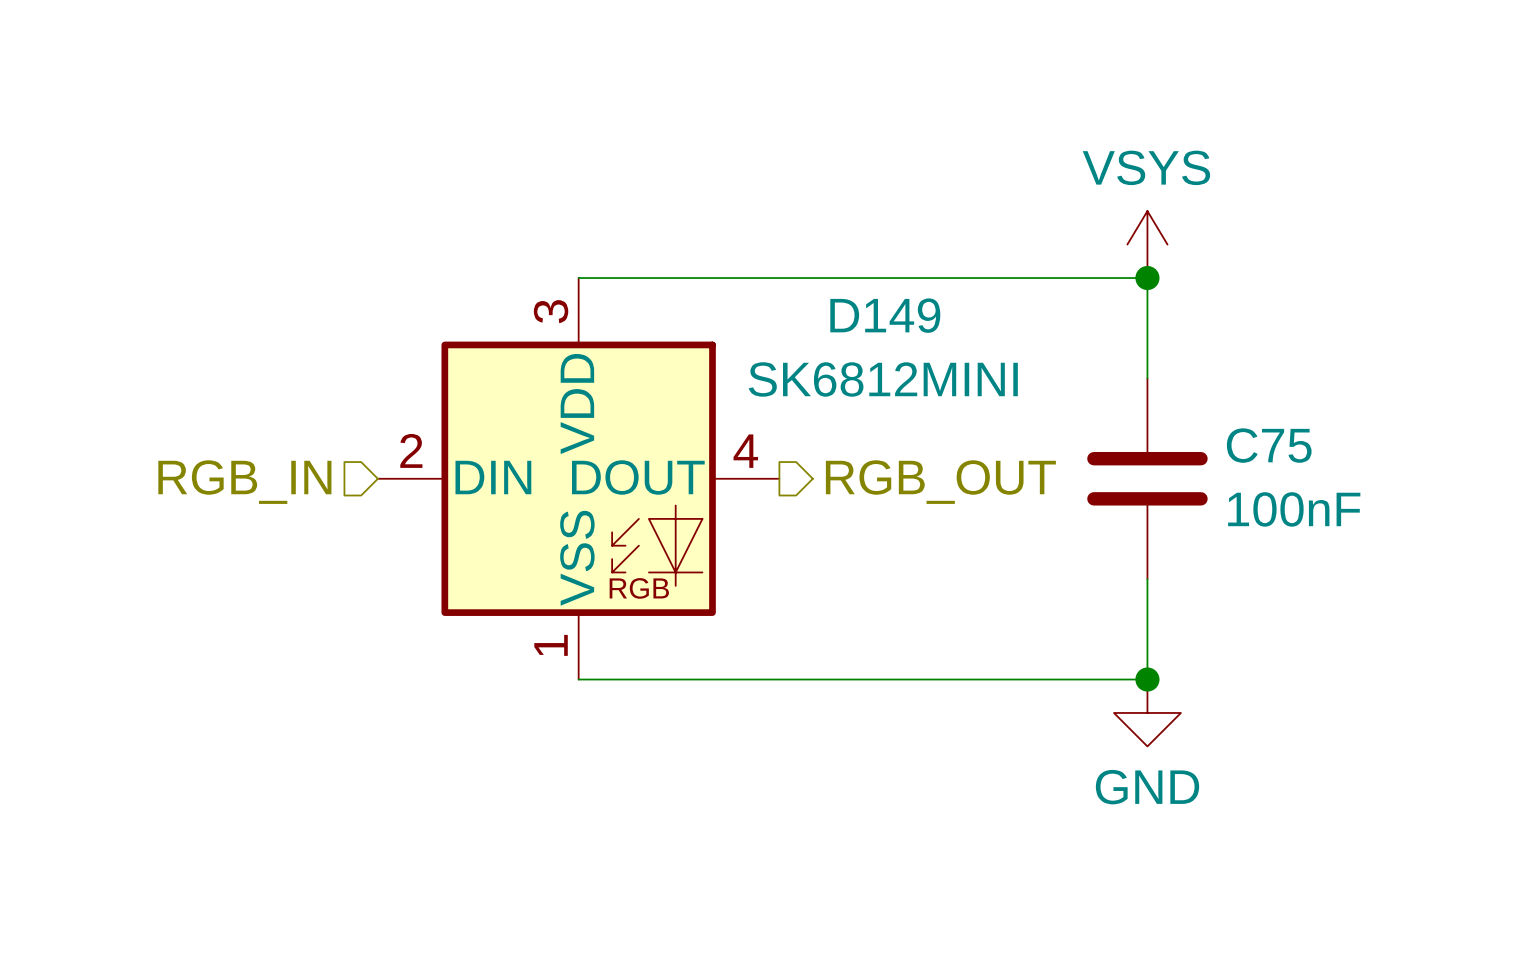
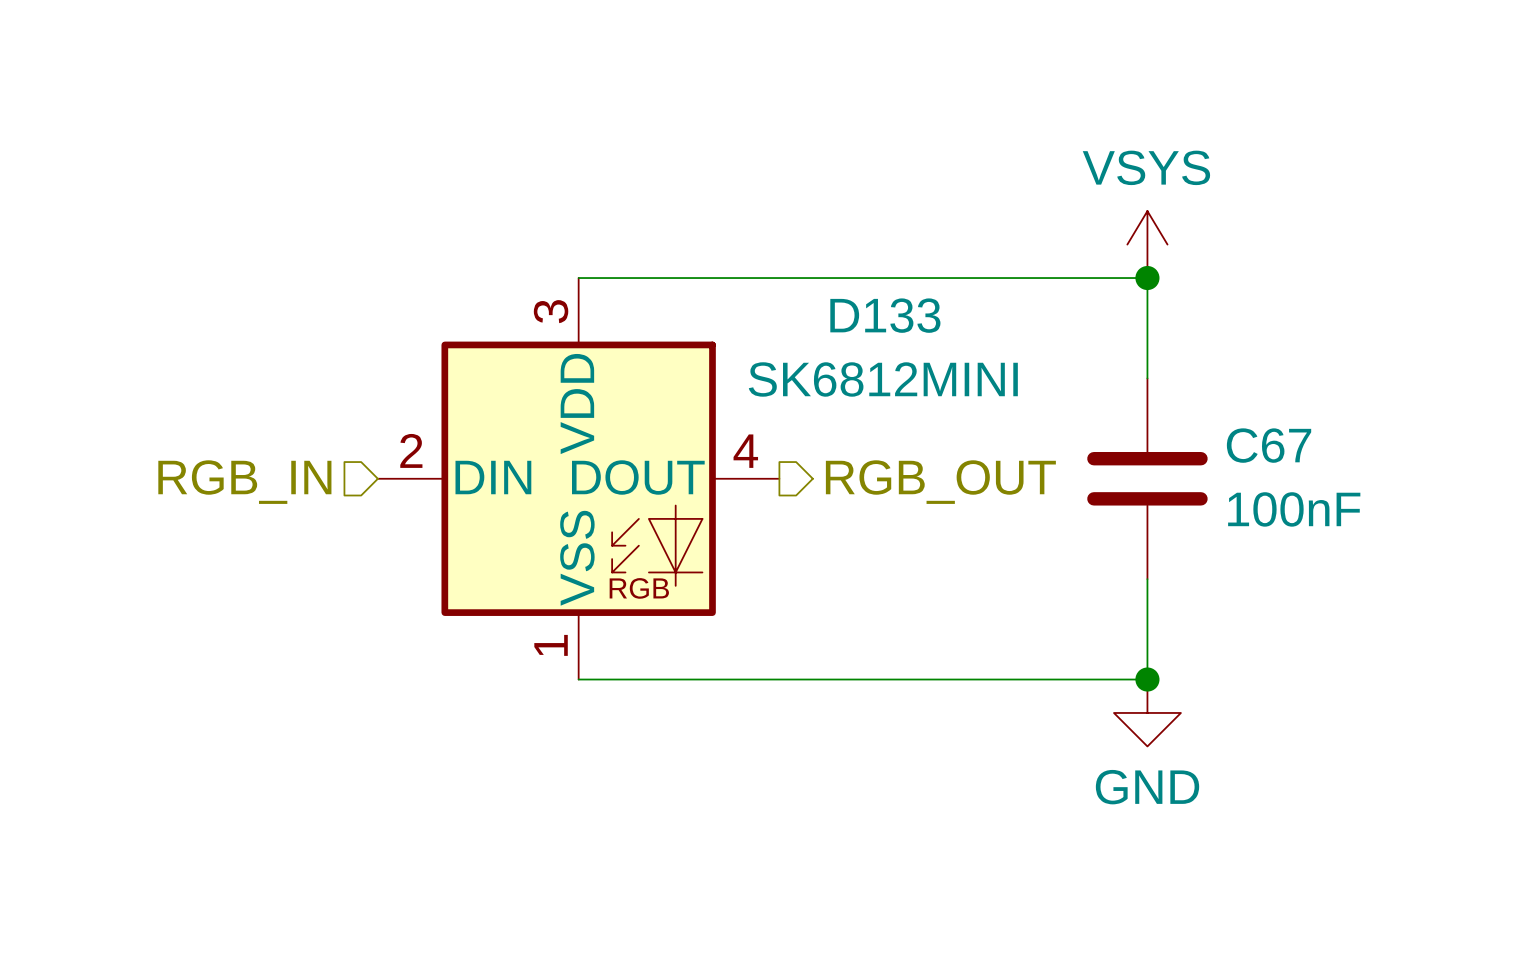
D149 name: D149 (885, 315) -> D133 (885, 315)
C75 name: C75 (1269, 445) -> C67 (1269, 445)

